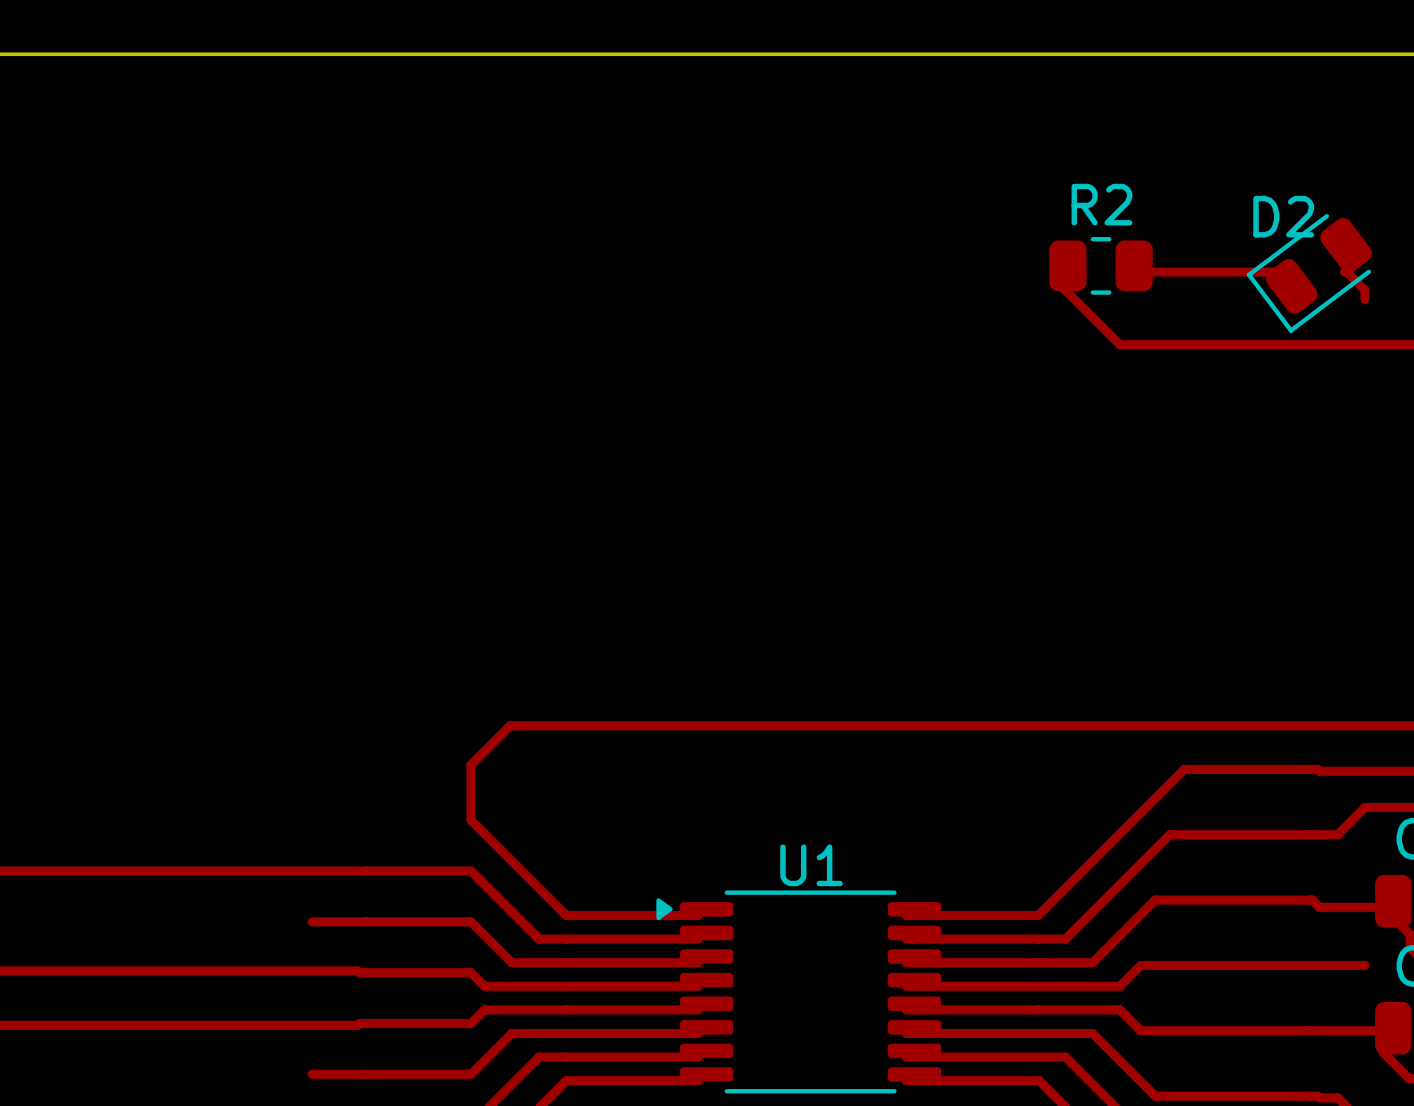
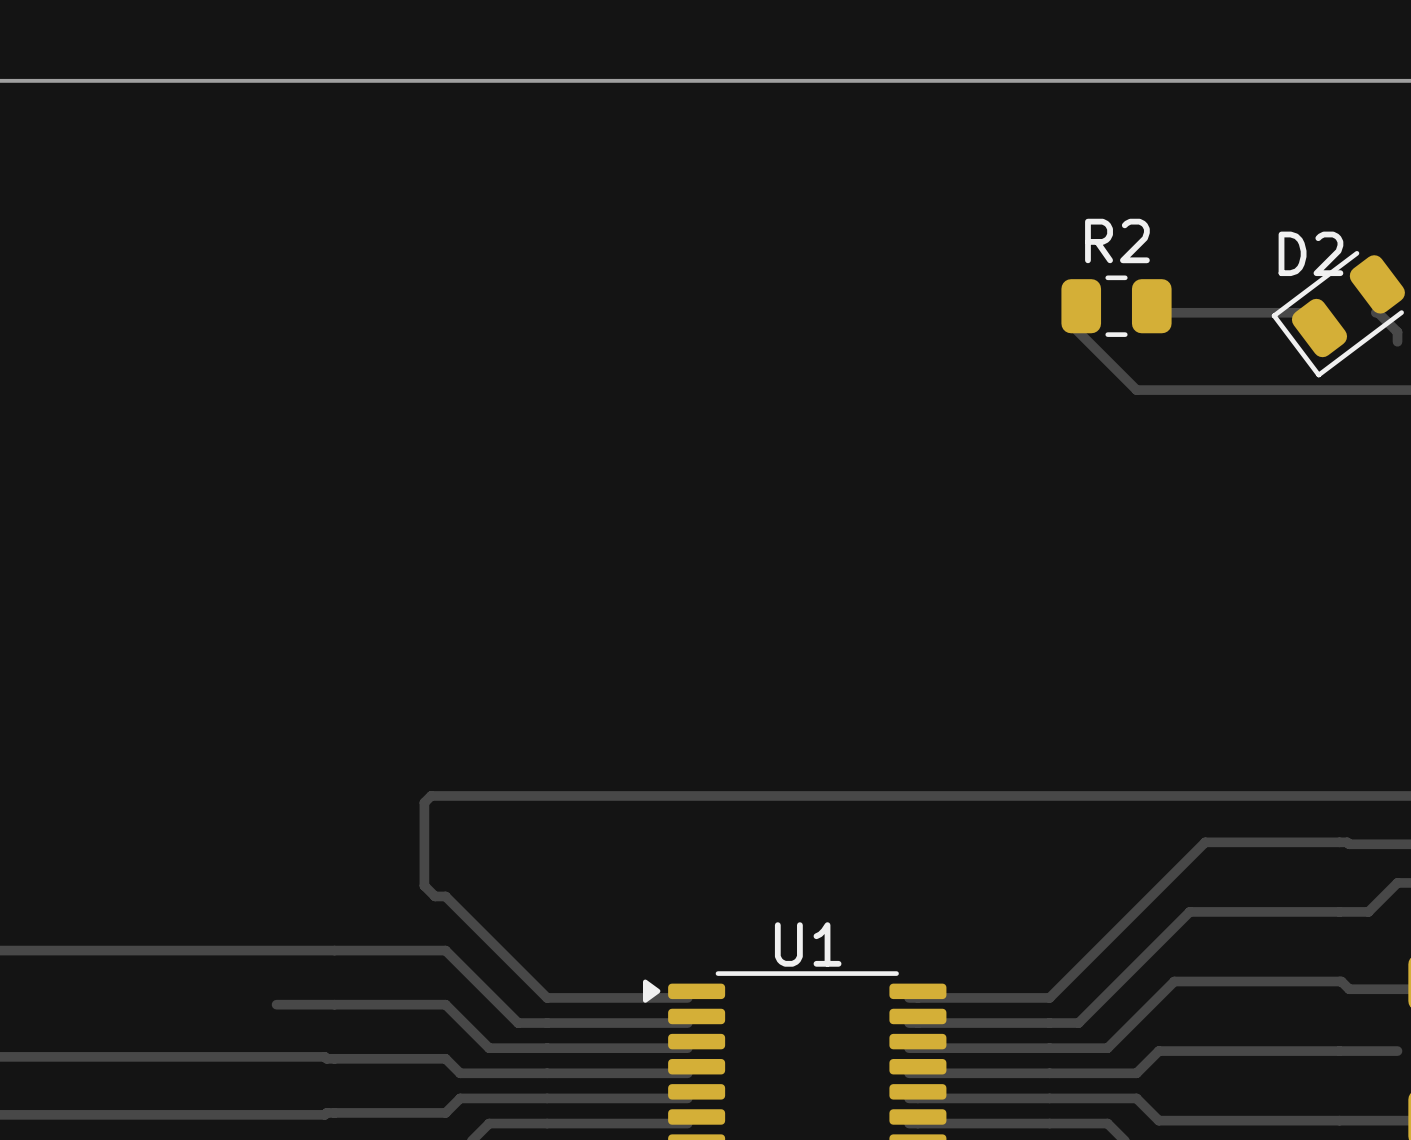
track: (510, 725) (471, 764) (471, 820) -> (487, 795) (431, 795) (424, 802) (424, 885) (435, 896) (445, 896)

